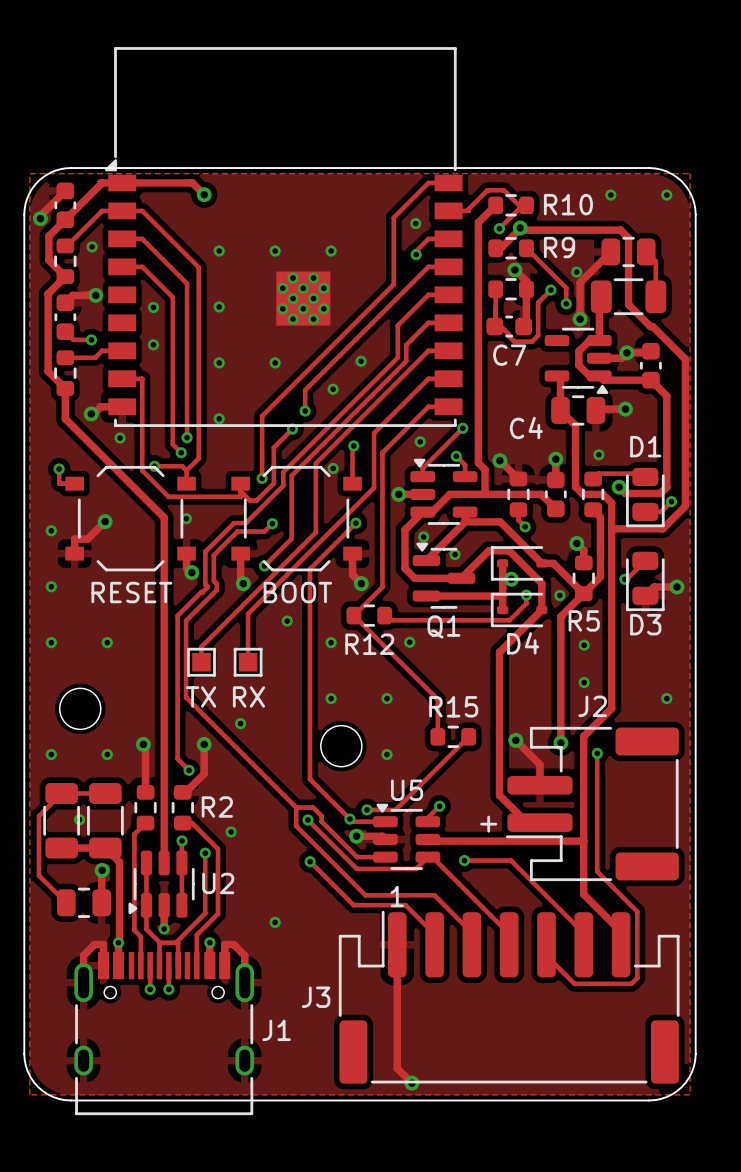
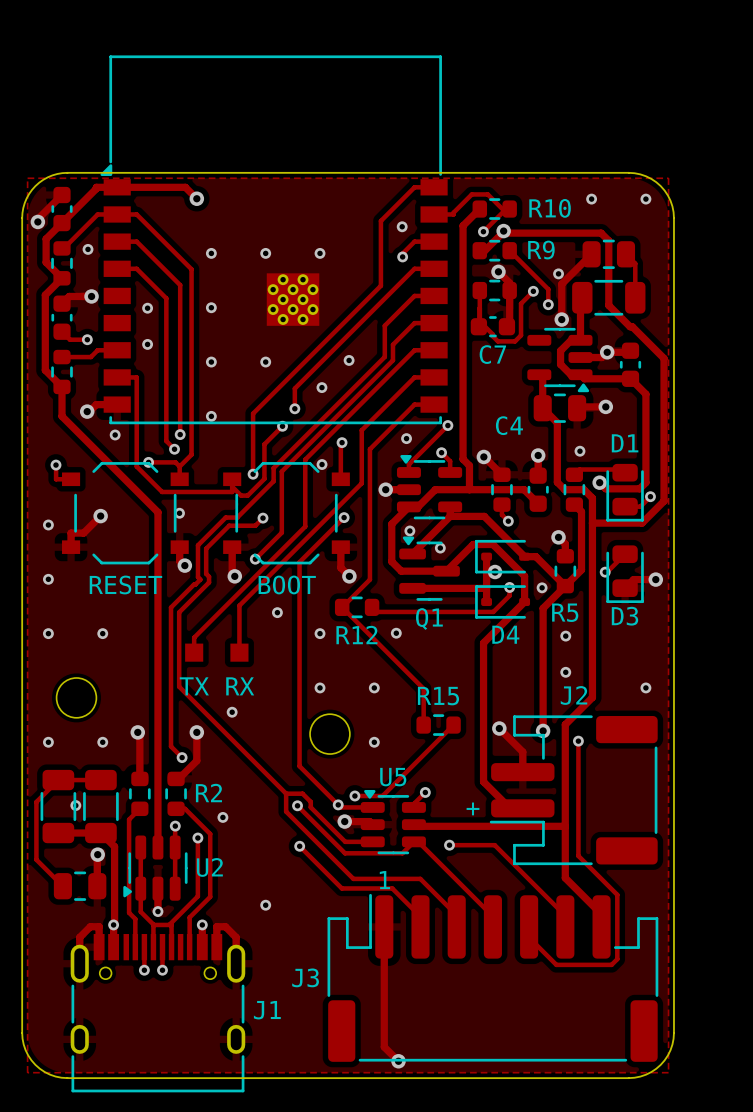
part footprint: [187, 647, 216, 677] -> [185, 643, 204, 662]
part footprint: [233, 647, 263, 677] -> [230, 643, 249, 662]

